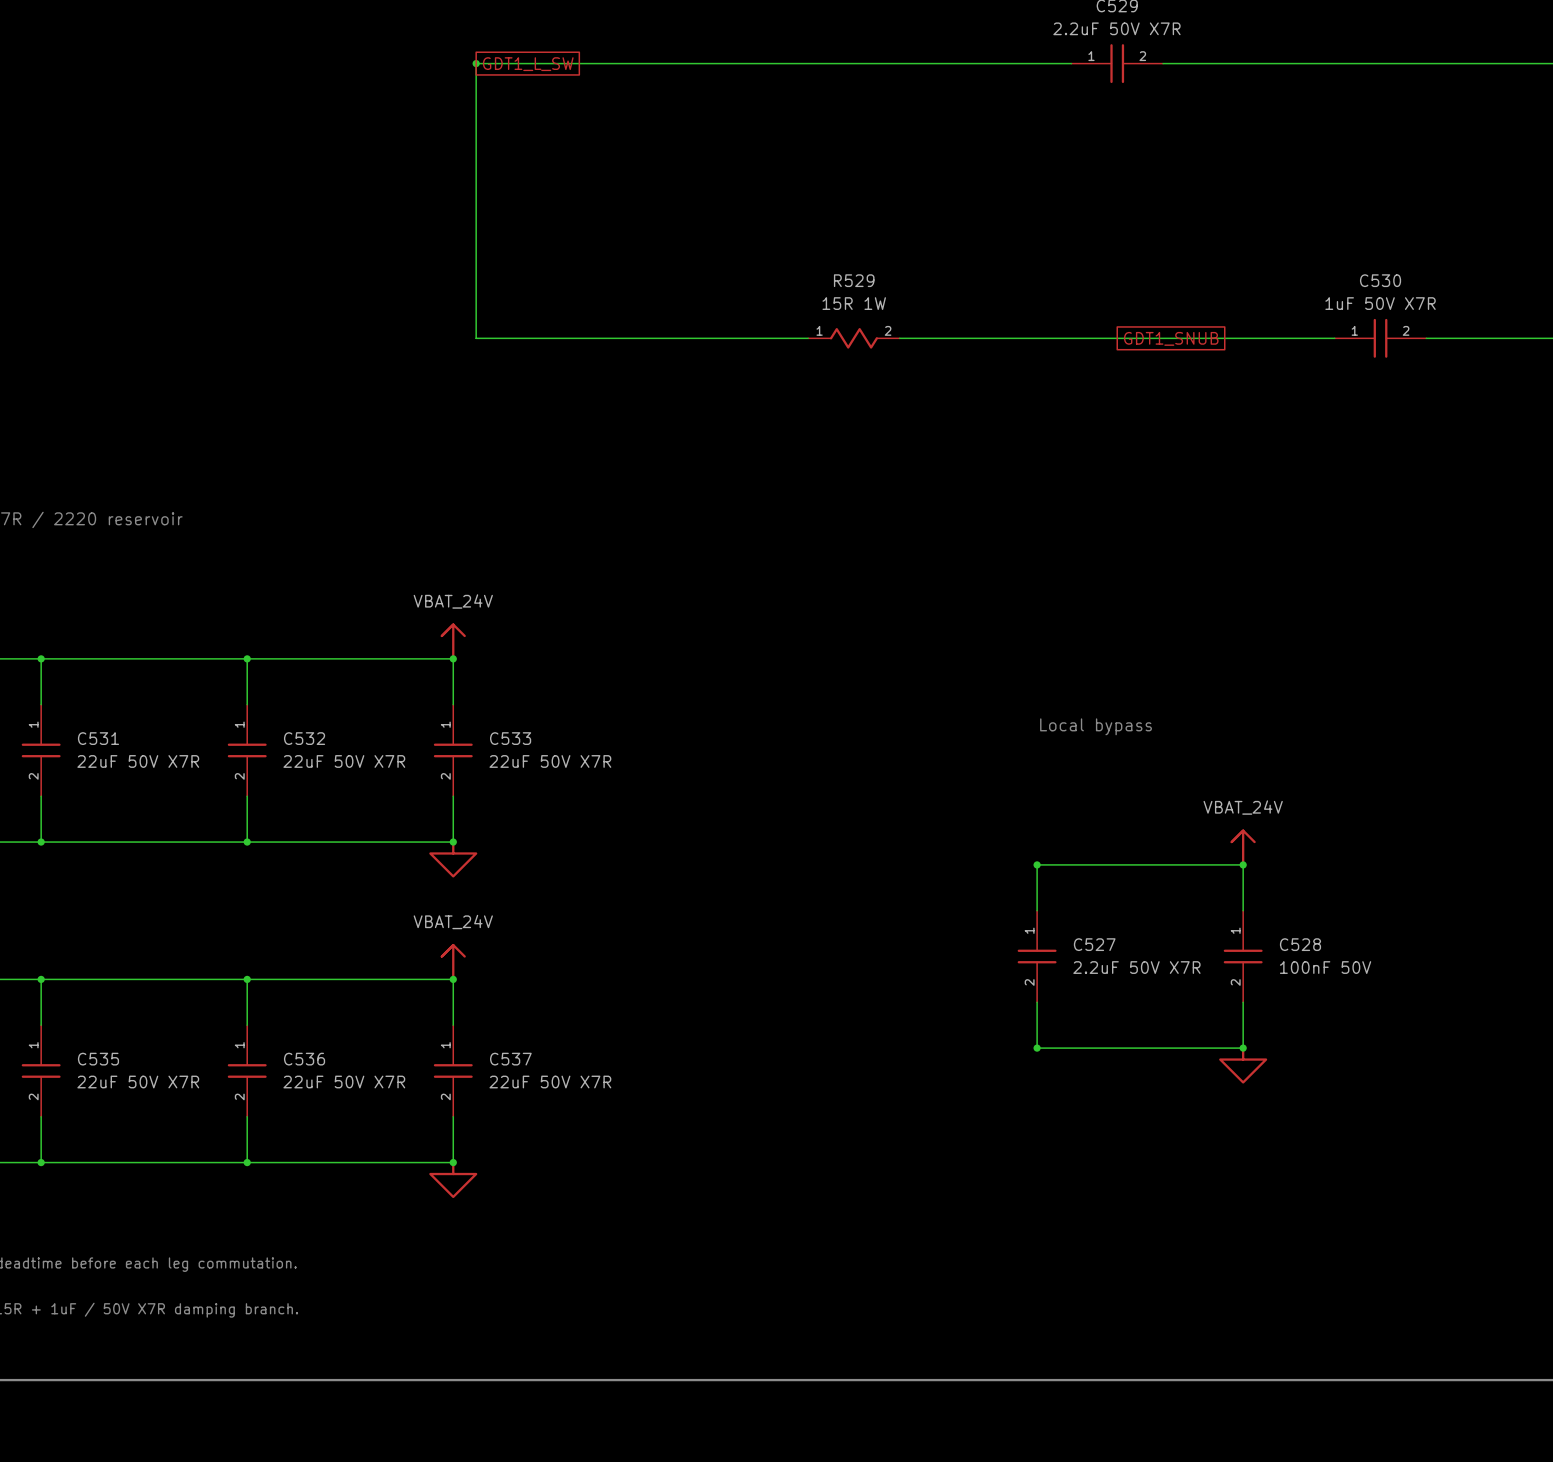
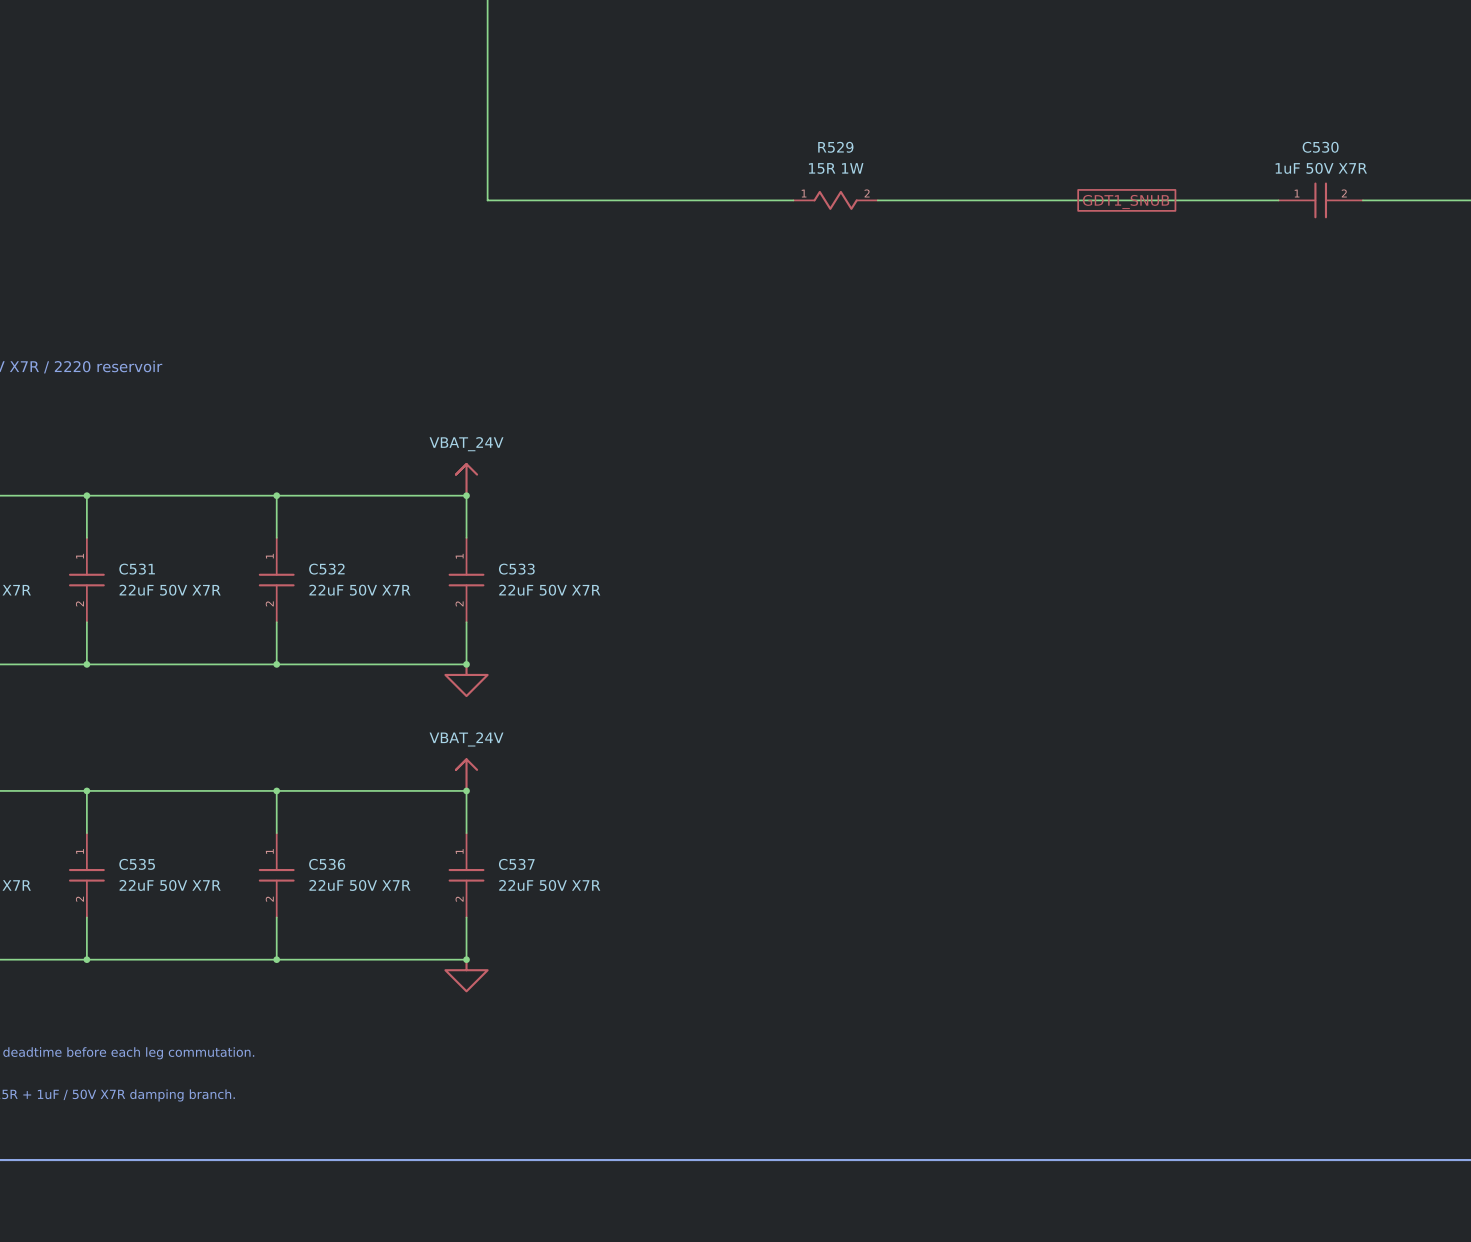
text: Local bypass (1096, 726) -> none
power symbol: VBAT_24V (1243, 847) -> none
junction: (1037, 864) -> none
junction: (1243, 864) -> none
wire: (1037, 910) (1037, 864) (1243, 864) (1243, 910) -> none
C527: 2.2uF 50V X7R (1037, 956) -> none
C528: 100nF 50V (1243, 956) -> none
wire: (1037, 1002) (1037, 1048) (1243, 1048) (1243, 1002) -> none
junction: (1037, 1048) -> none
junction: (1243, 1048) -> none
power symbol: (1243, 1065) -> none

